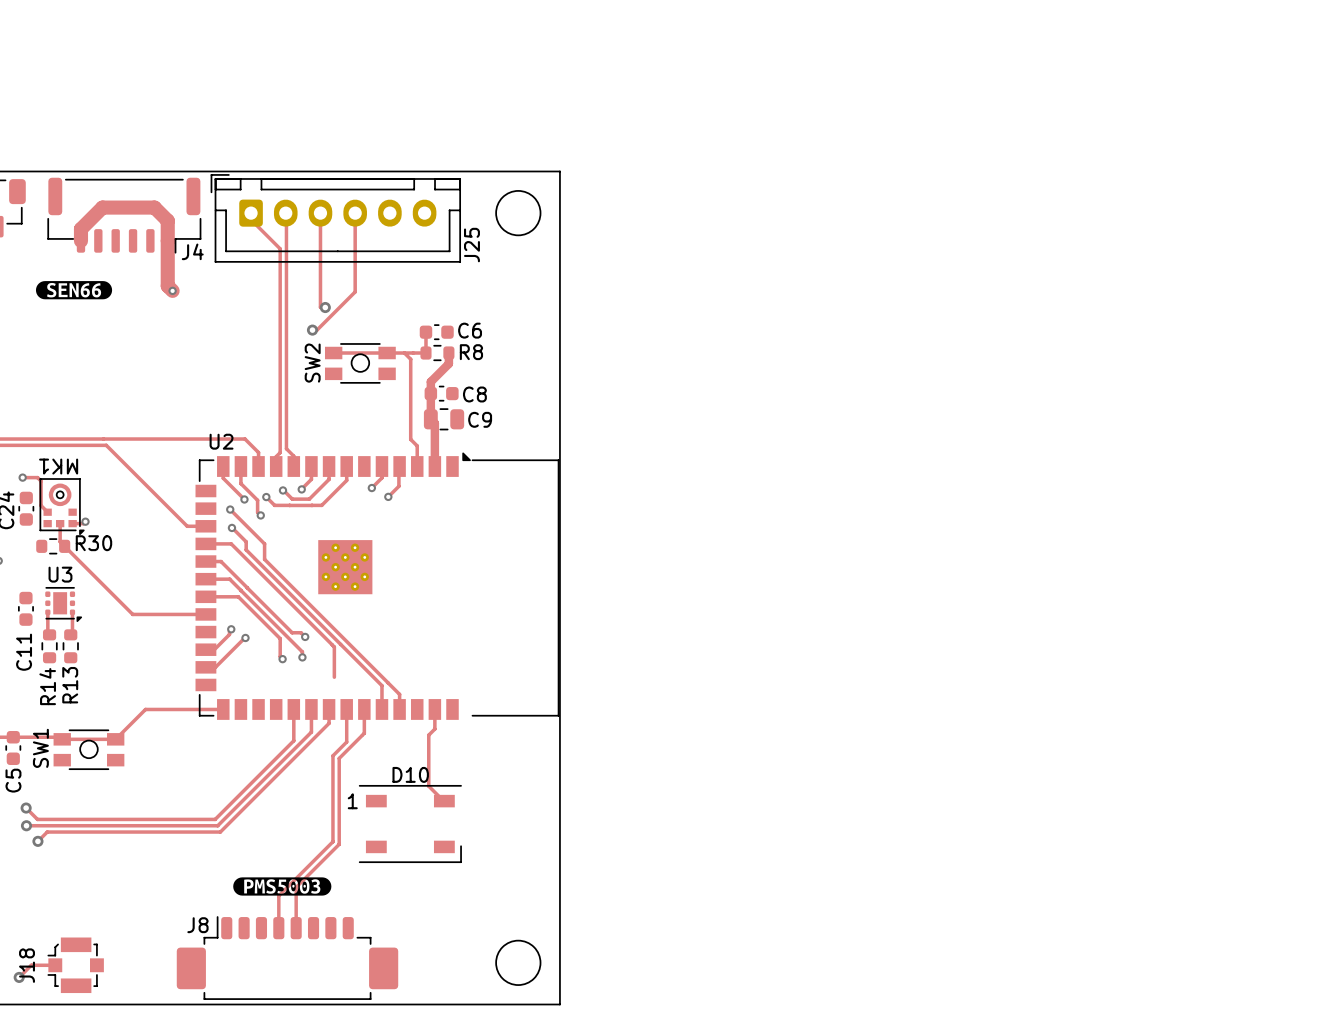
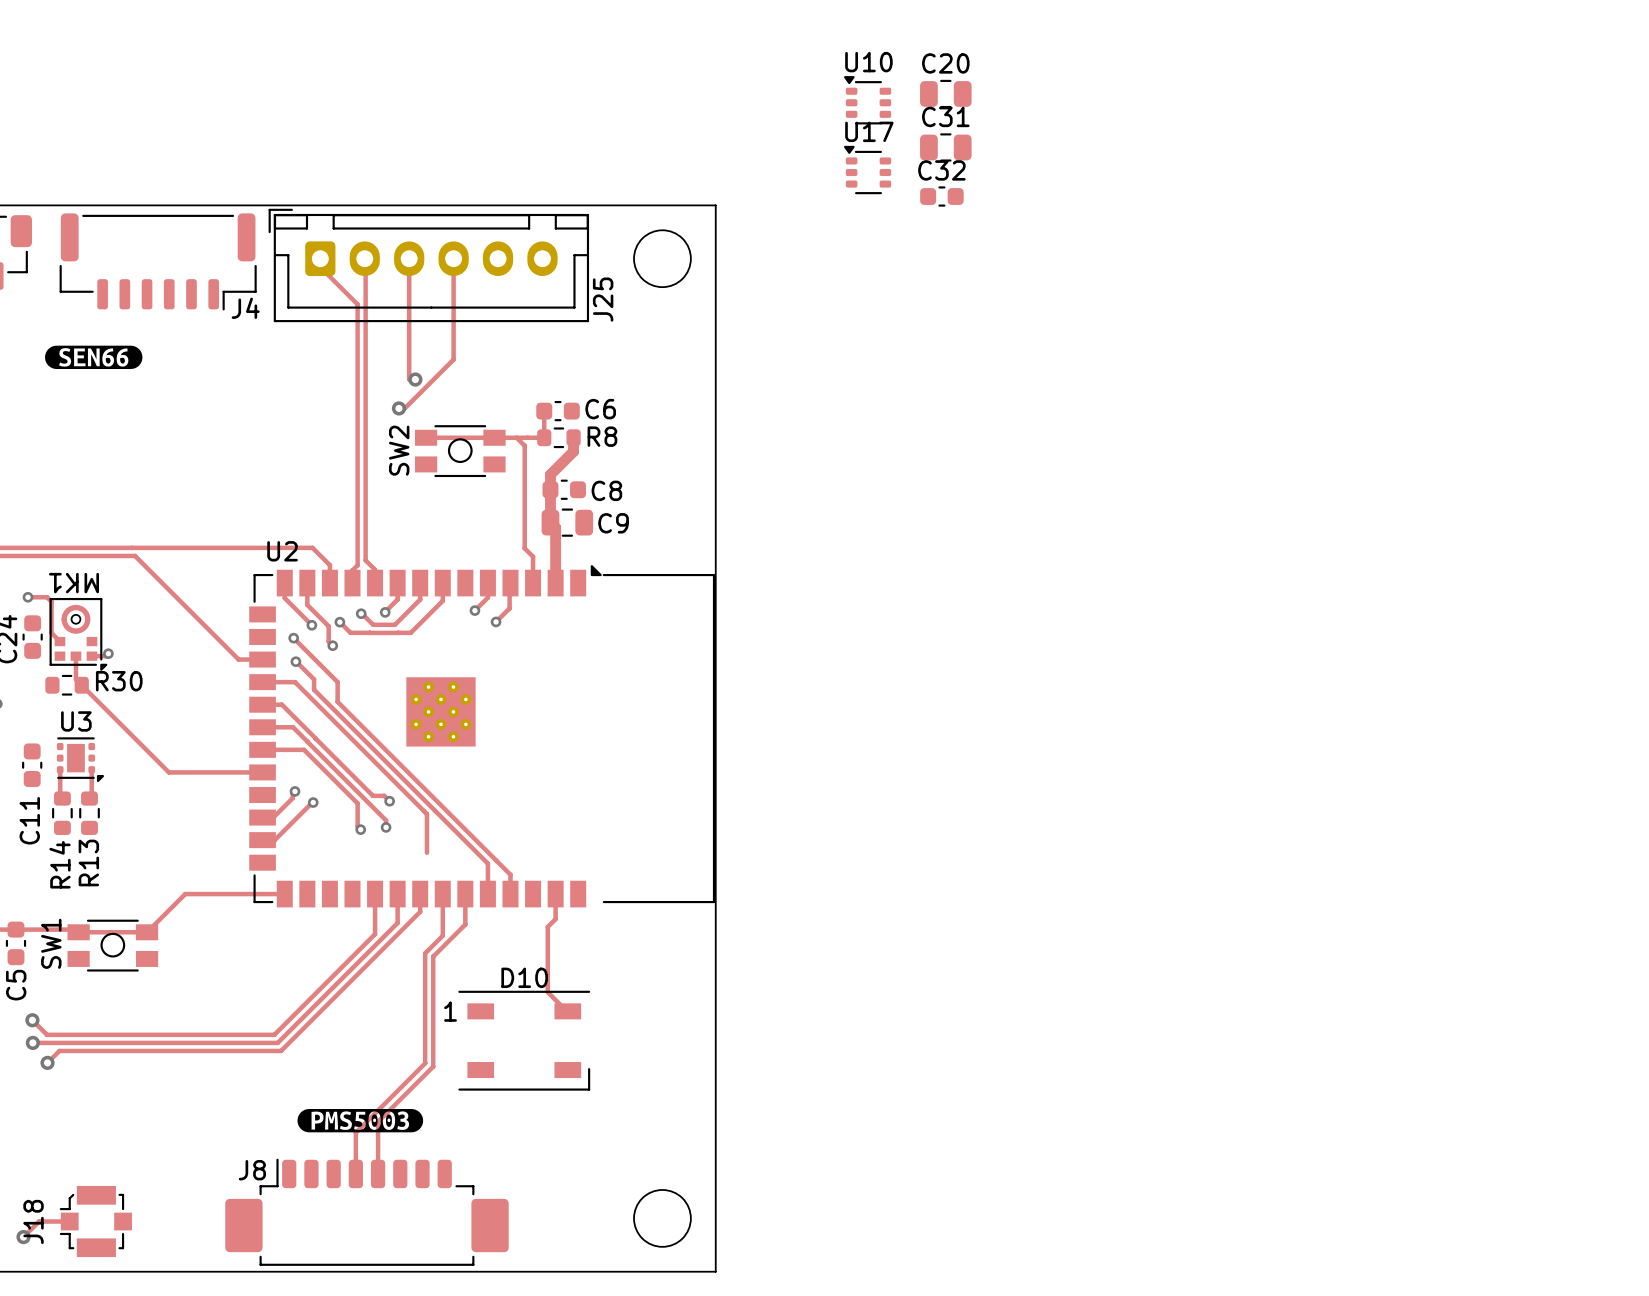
C20: none -> (945, 93)
U10: none -> (867, 100)
C31: none -> (945, 147)
U17: none -> (867, 170)
C32: none -> (941, 196)
track: (80, 240) (80, 229) (102, 207) (154, 207) (167, 220) (167, 286) (172, 290) -> none
via: (172, 290) -> none

